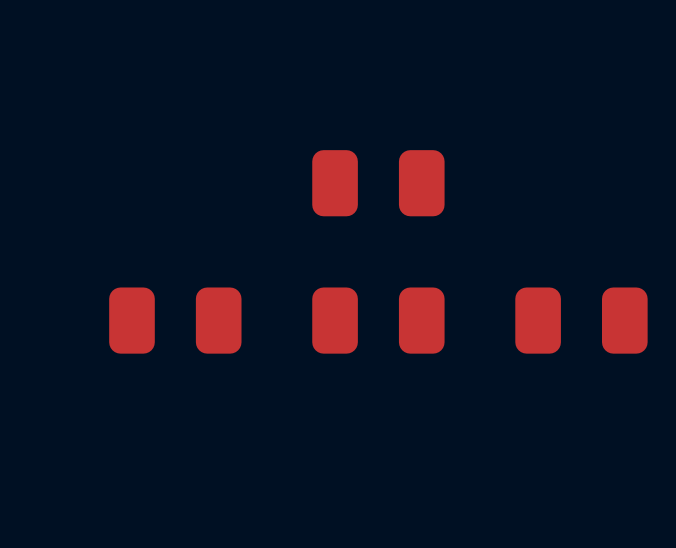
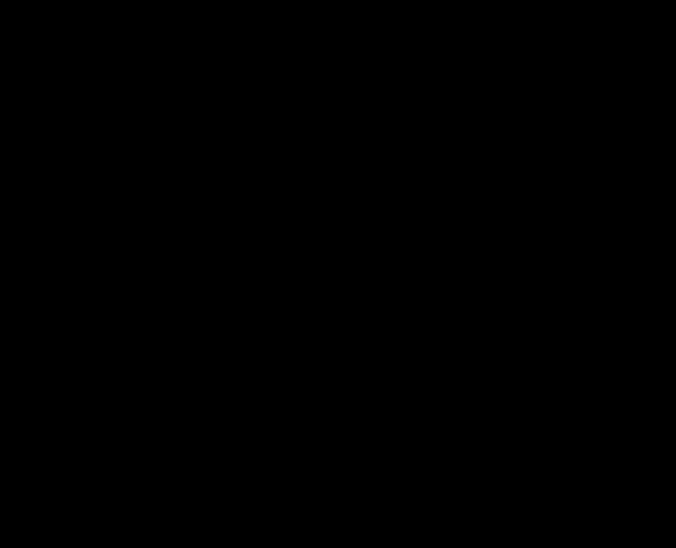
part: (378, 183) -> none
part: (175, 320) -> none
part: (378, 320) -> none
part: (581, 320) -> none

